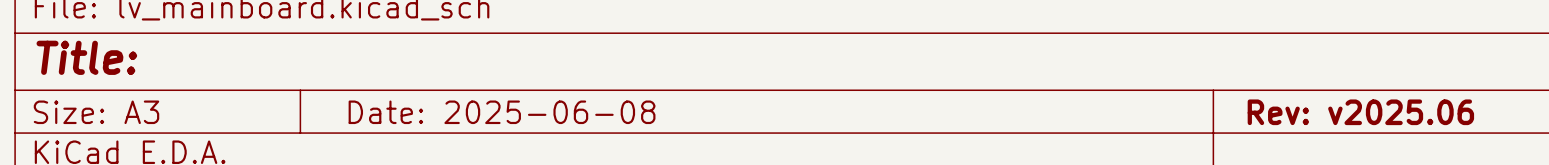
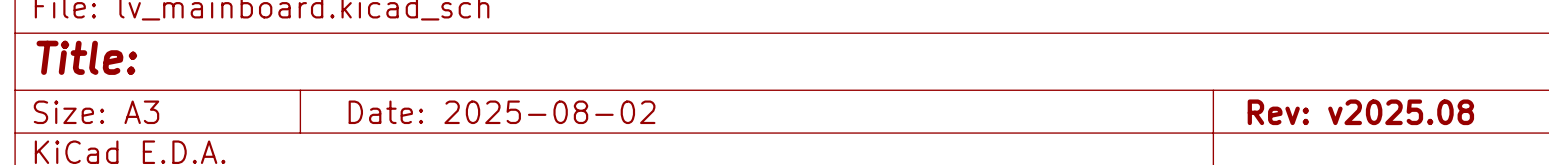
title block: Date: 2025-06-08 (502, 112) -> Date: 2025-08-02 (502, 112)
title block: Rev: v2025.06 (1360, 112) -> Rev: v2025.08 (1360, 112)

